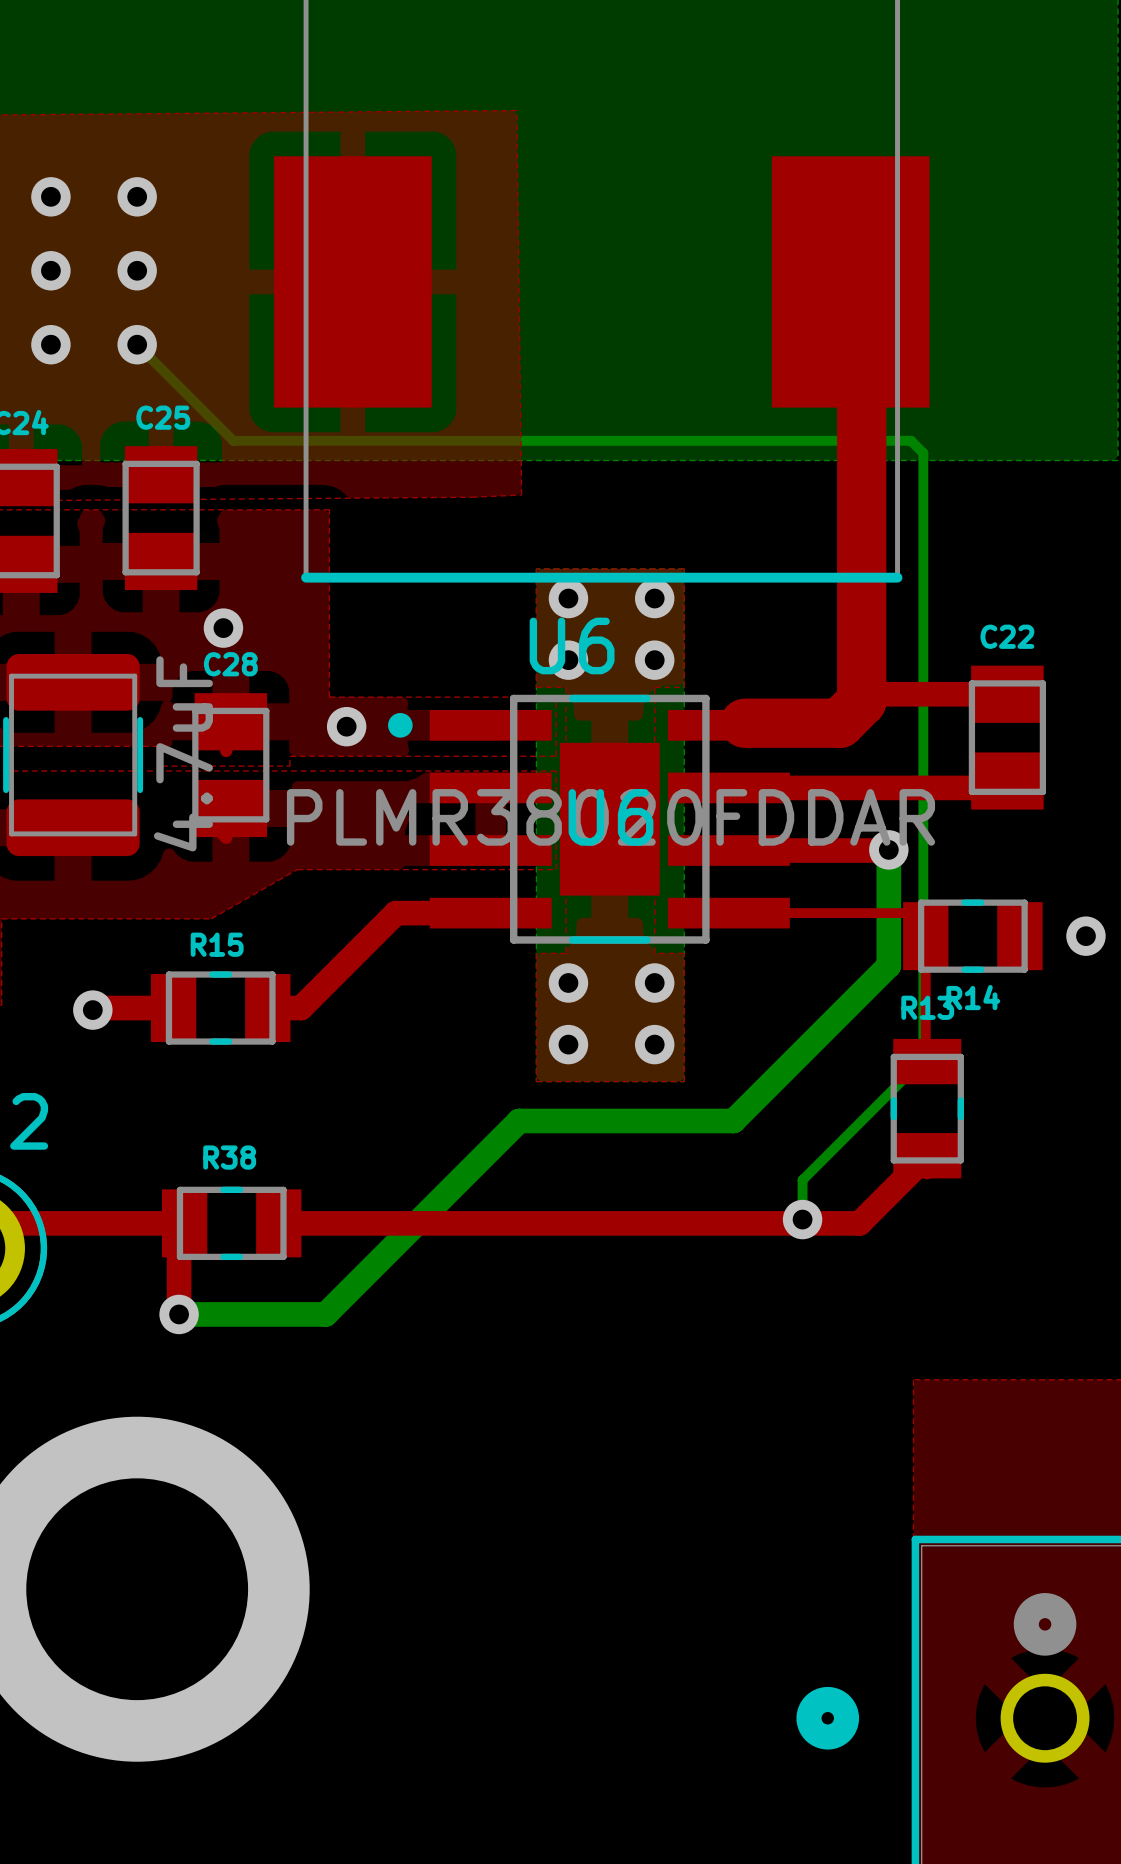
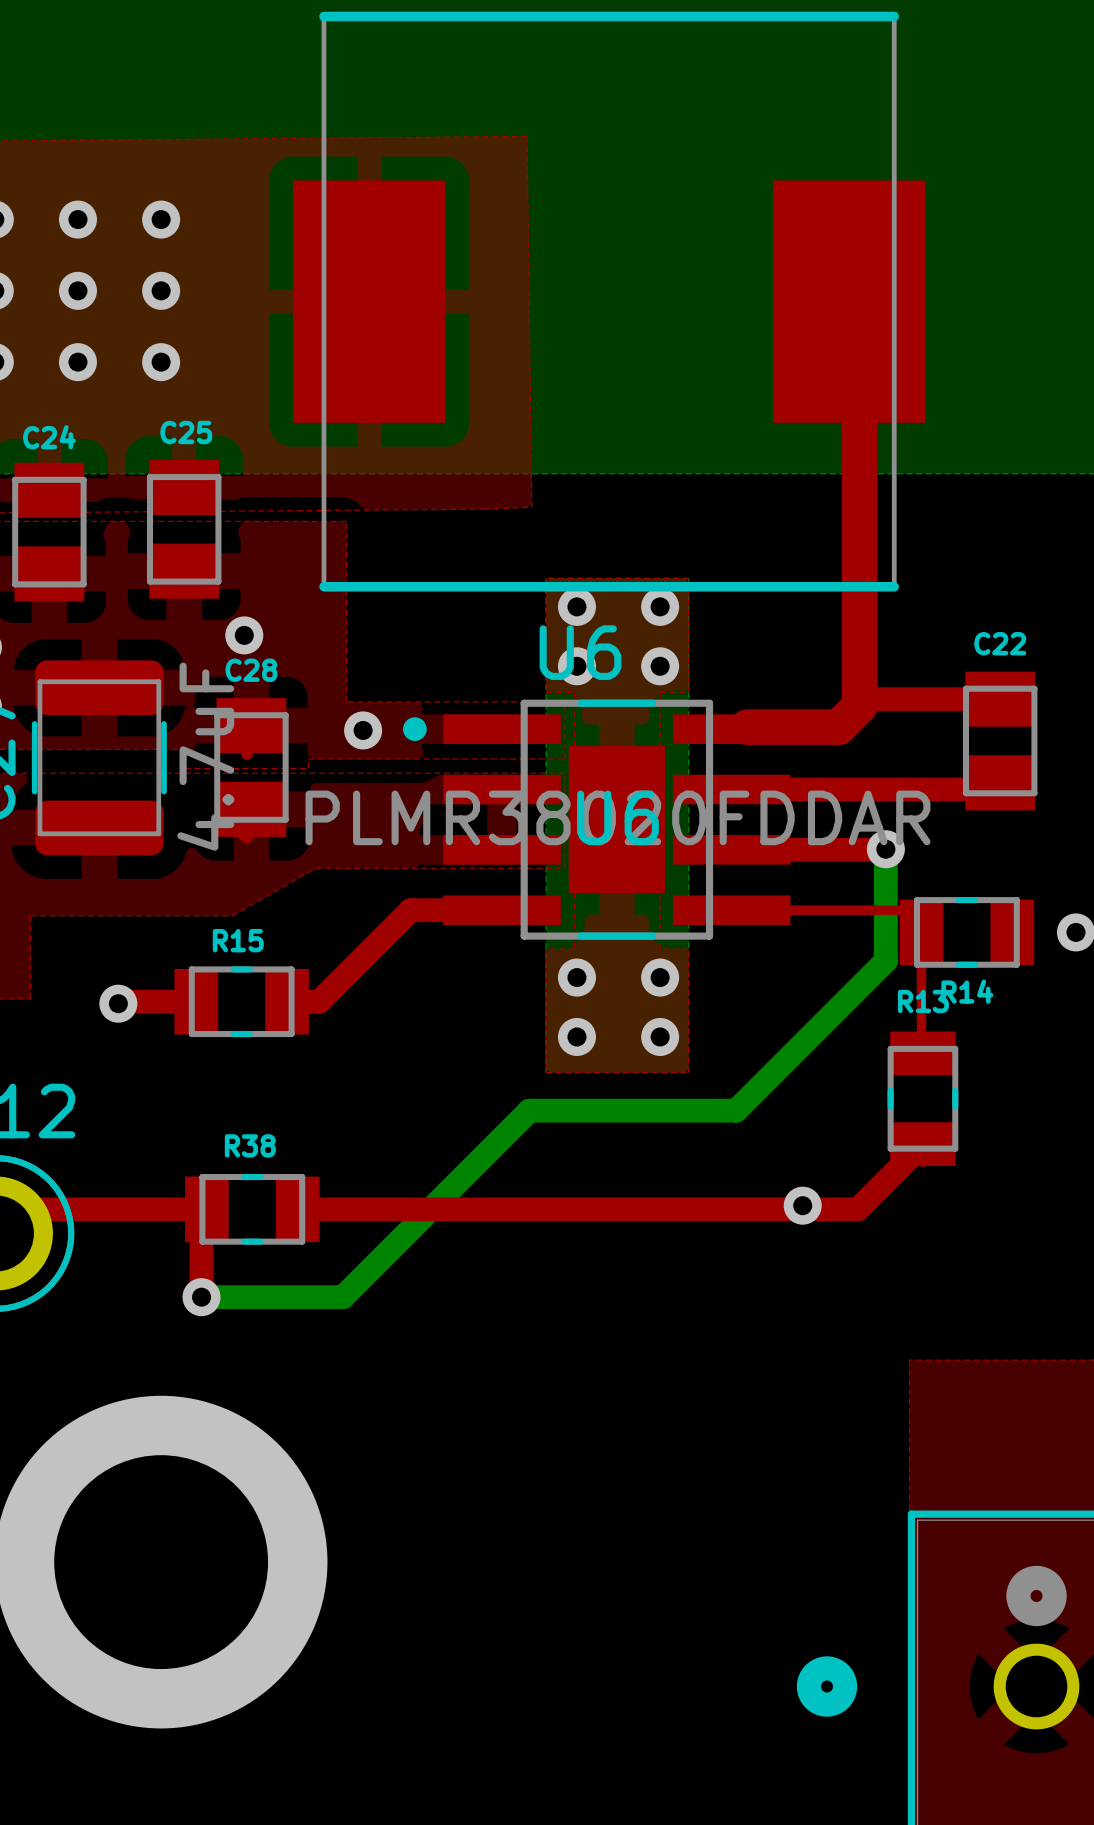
top track width: thick (861, 278) (861, 701) (839, 723) (744, 723) -> thin (859, 298) (859, 706) (838, 727) (746, 727)
bottom track: (137, 344) (233, 440) (911, 440) (923, 453) (923, 1059) (802, 1180) (802, 1219) -> none

